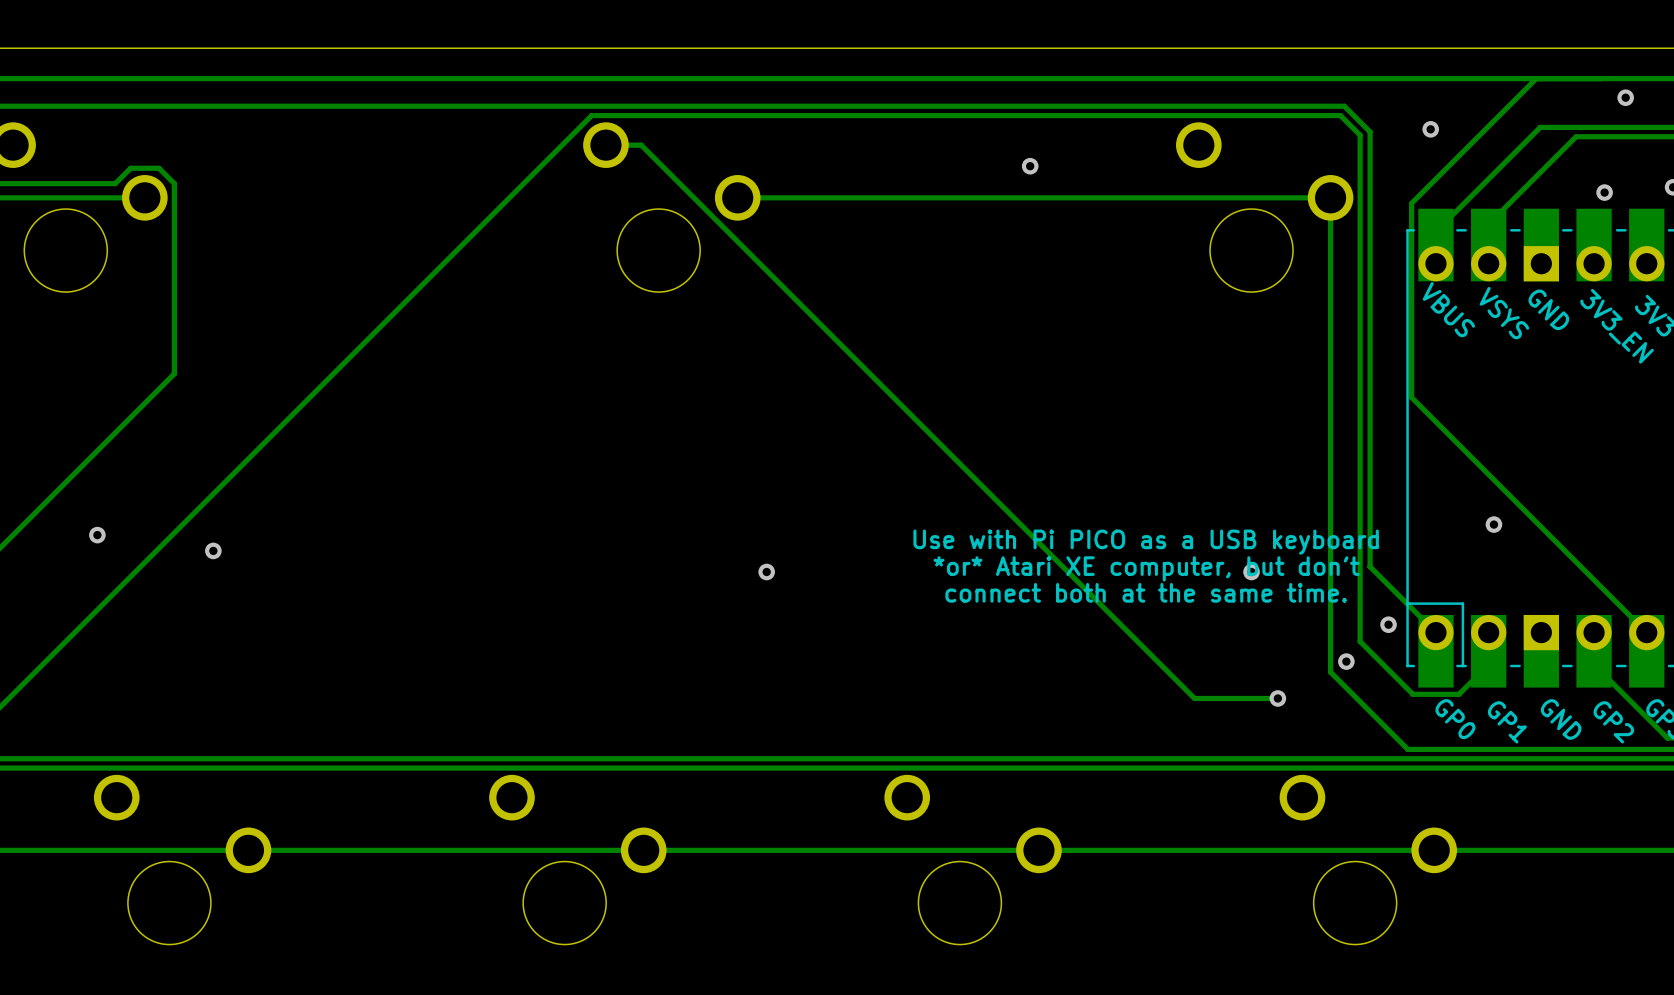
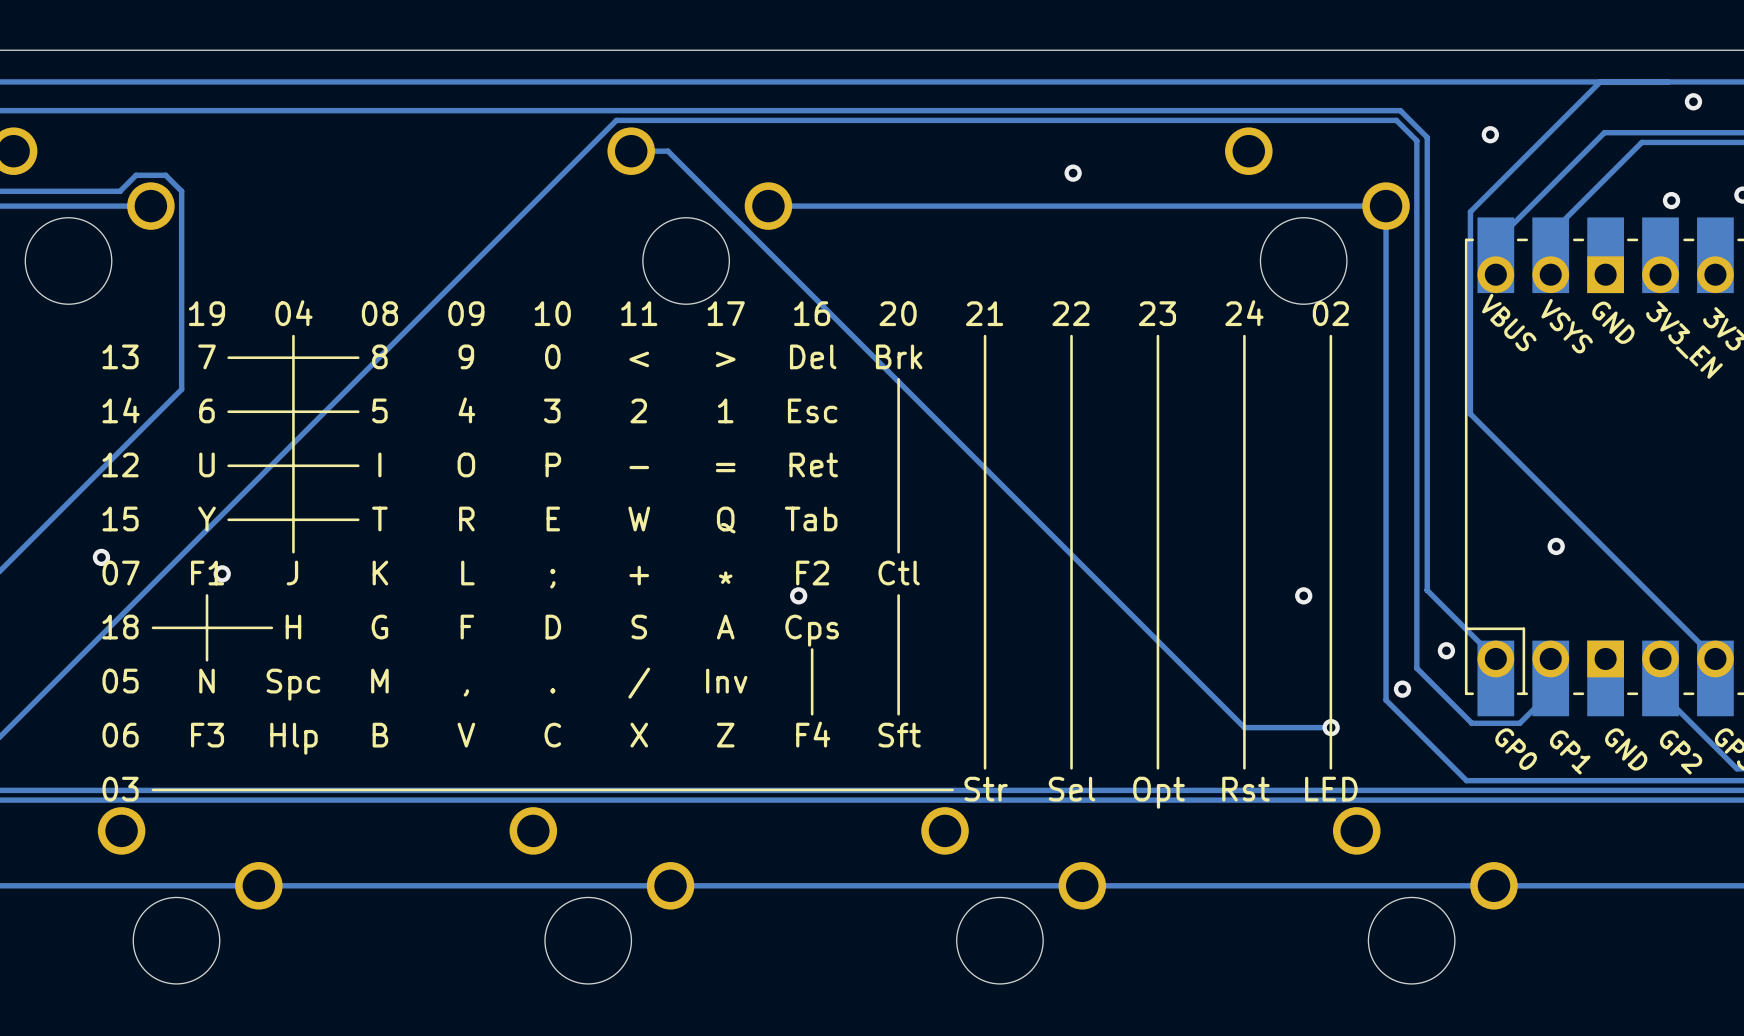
drawing: none -> [151, 334, 1333, 792]
text: Use with Pi PICO as a USB keyboard (1146, 542) -> none
text: *or* Atari XE computer, but don't (1146, 568) -> none
text: connect both at the same time. (1146, 592) -> none

